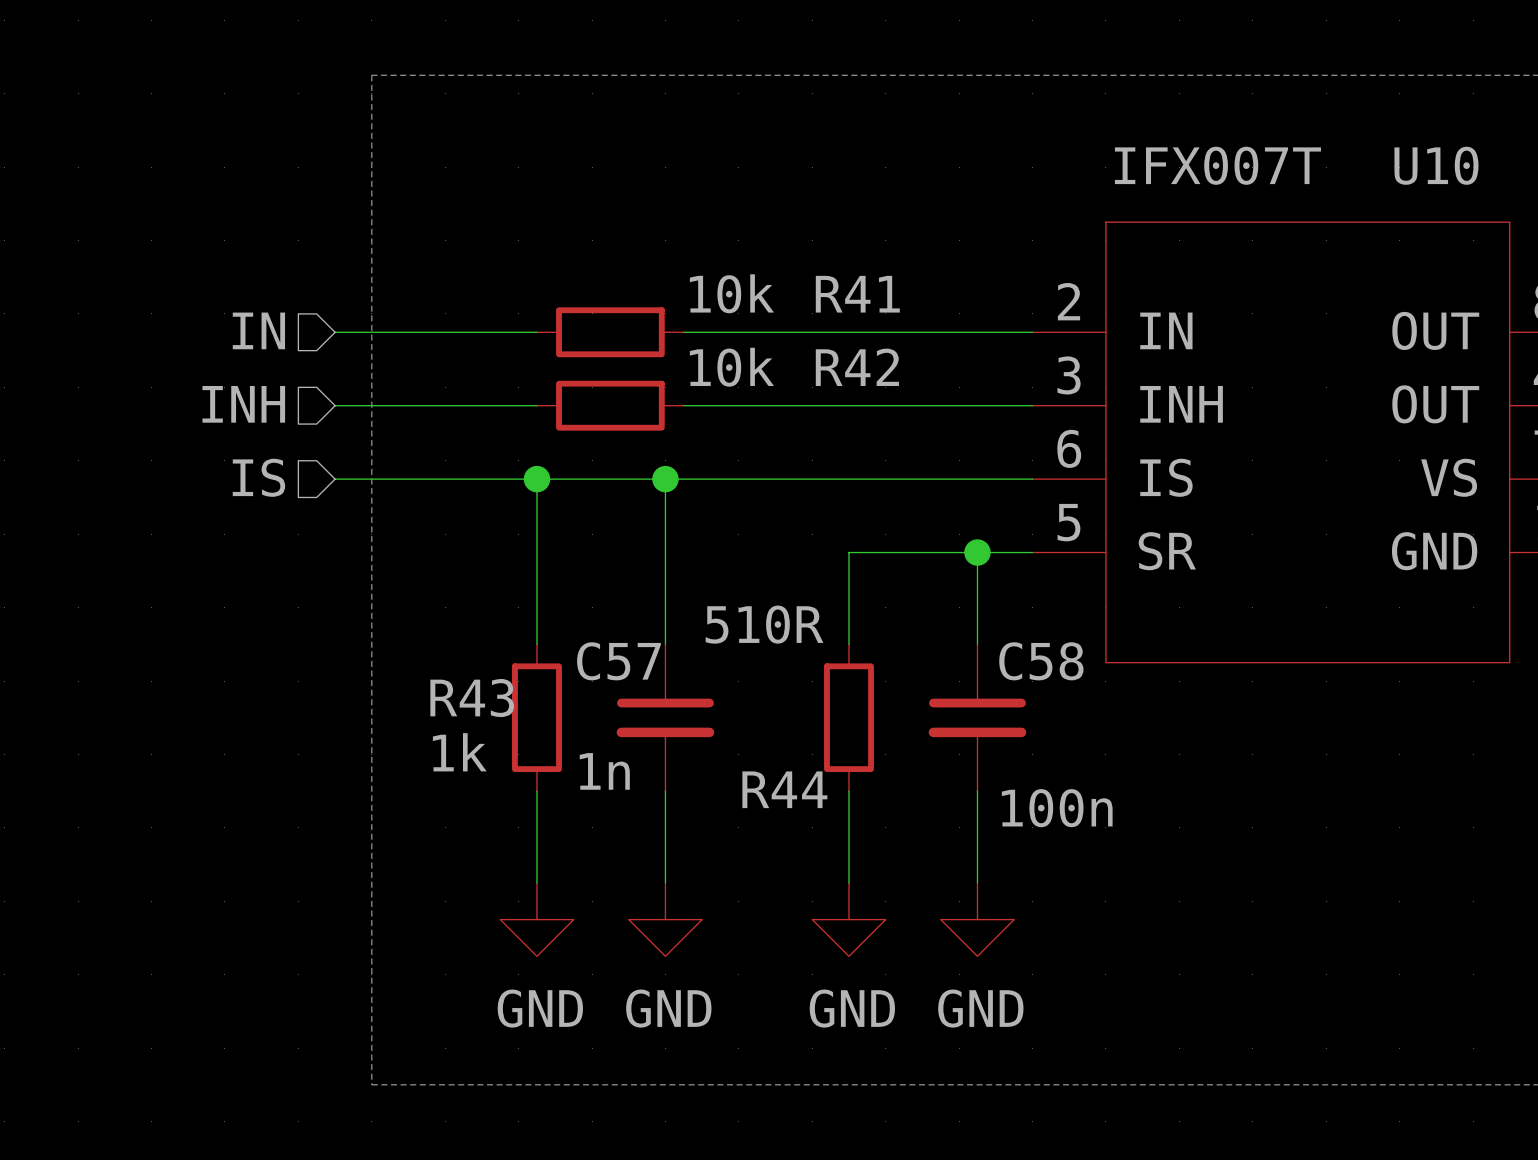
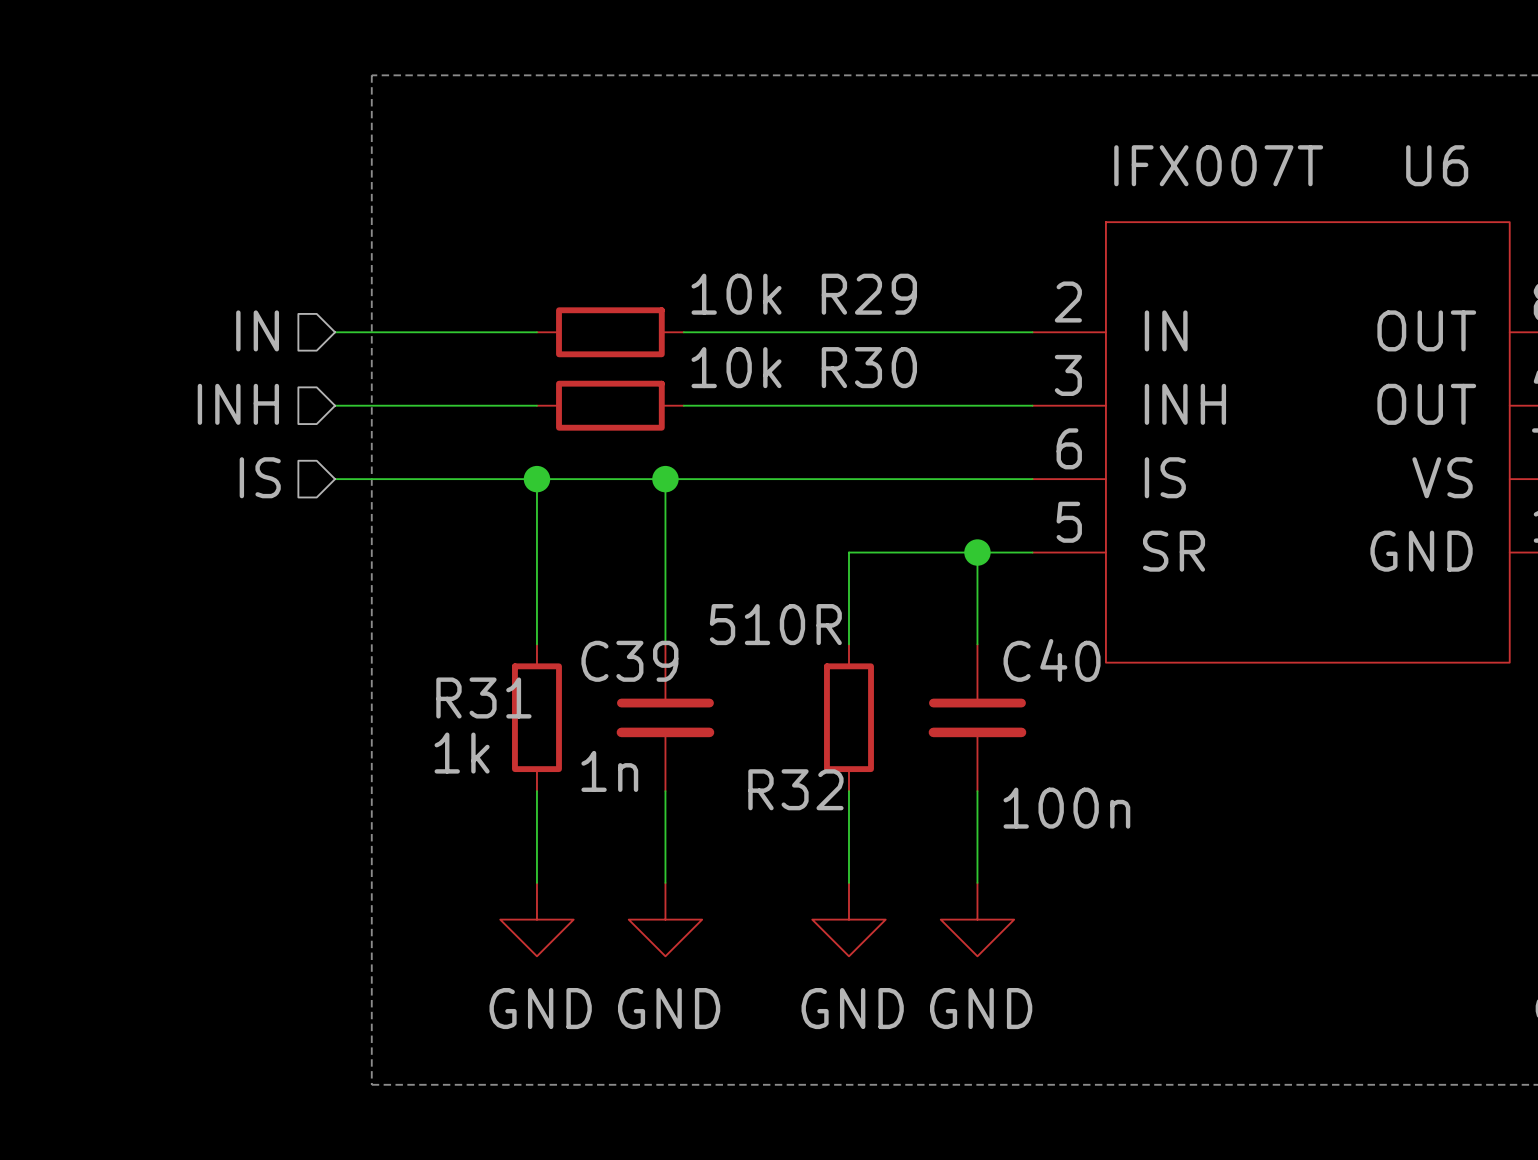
U10 name: U10 (1436, 165) -> U6 (1437, 165)
R41 name: R41 (857, 294) -> R29 (869, 294)
R42 name: R42 (857, 367) -> R30 (869, 367)
C57 name: C57 (618, 661) -> C39 (629, 661)
C58 name: C58 (1041, 661) -> C40 (1052, 660)
R43 name: R43 (472, 698) -> R31 (483, 697)
R44 name: R44 (784, 789) -> R32 (795, 789)

